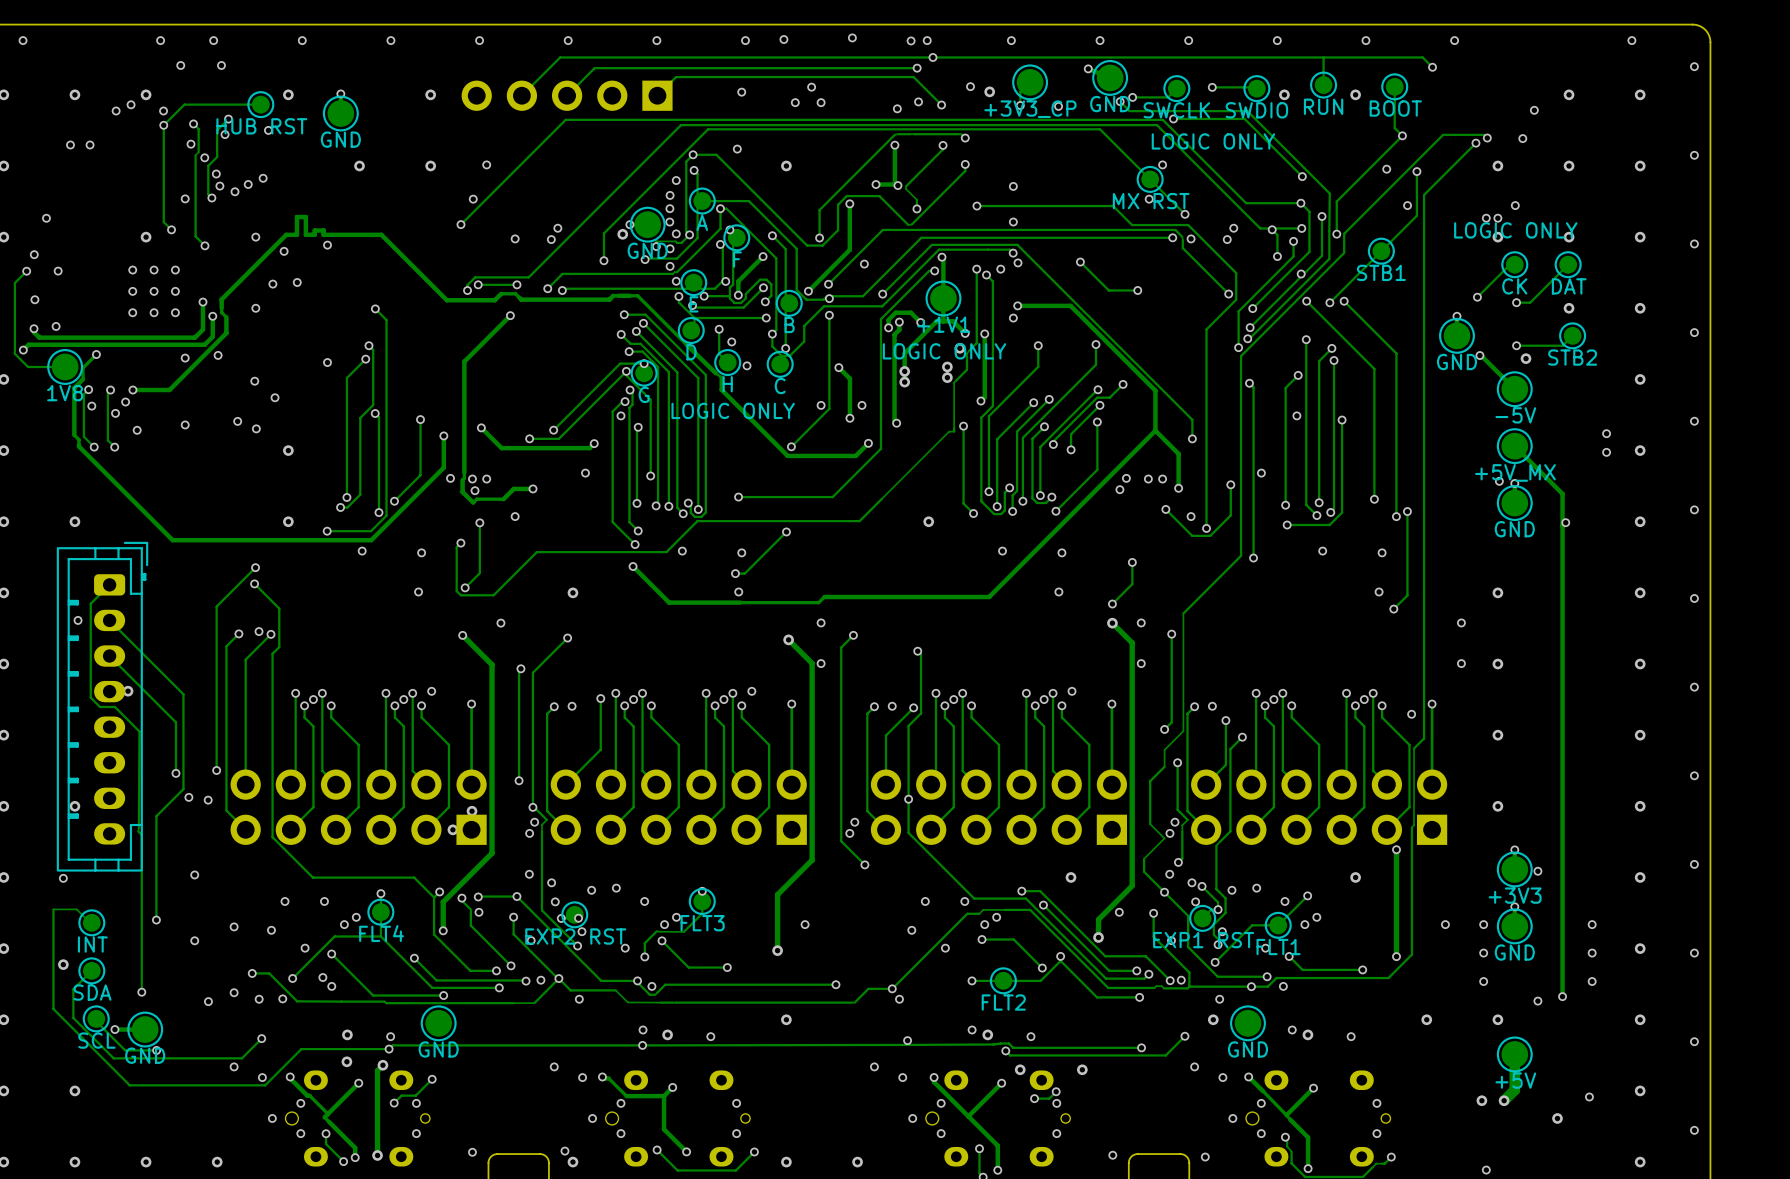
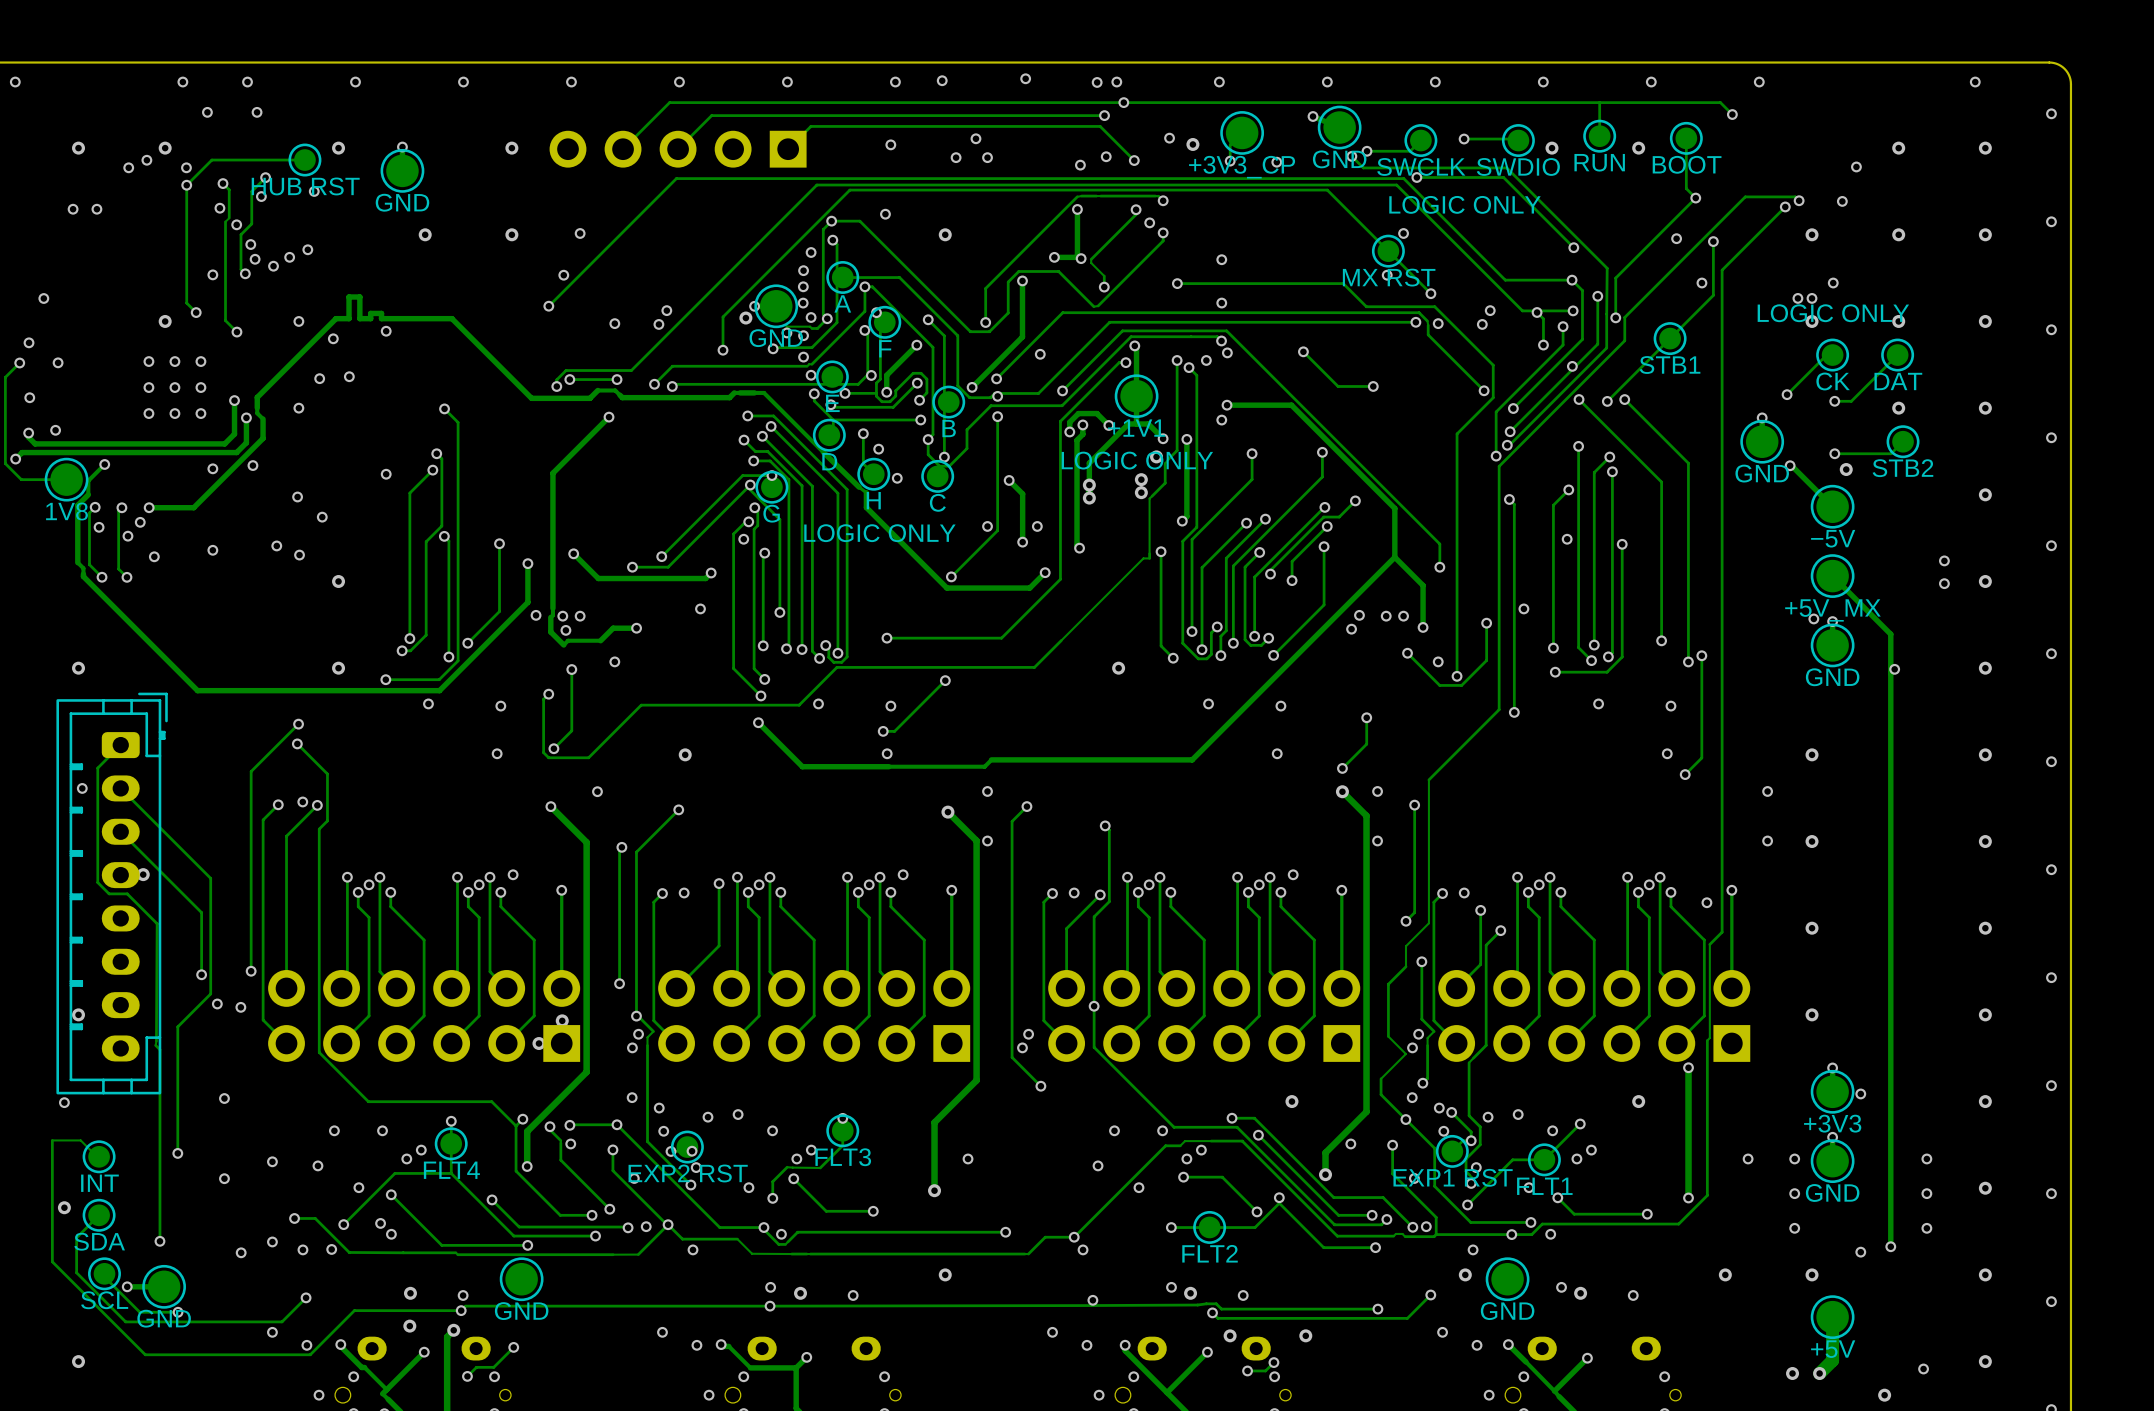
via: none -> (1149, 222)

